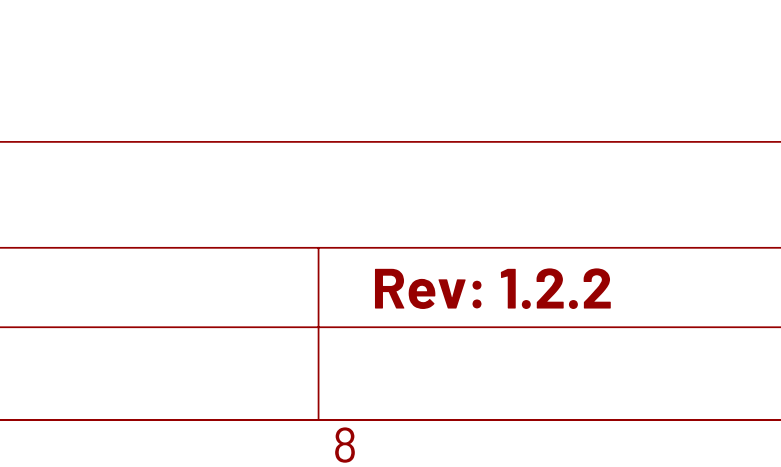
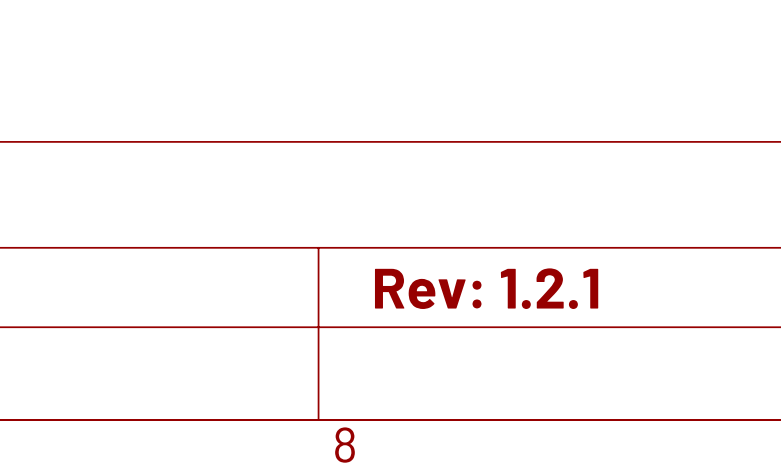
title block: Rev: 1.2.2 (492, 288) -> Rev: 1.2.1 (486, 288)

